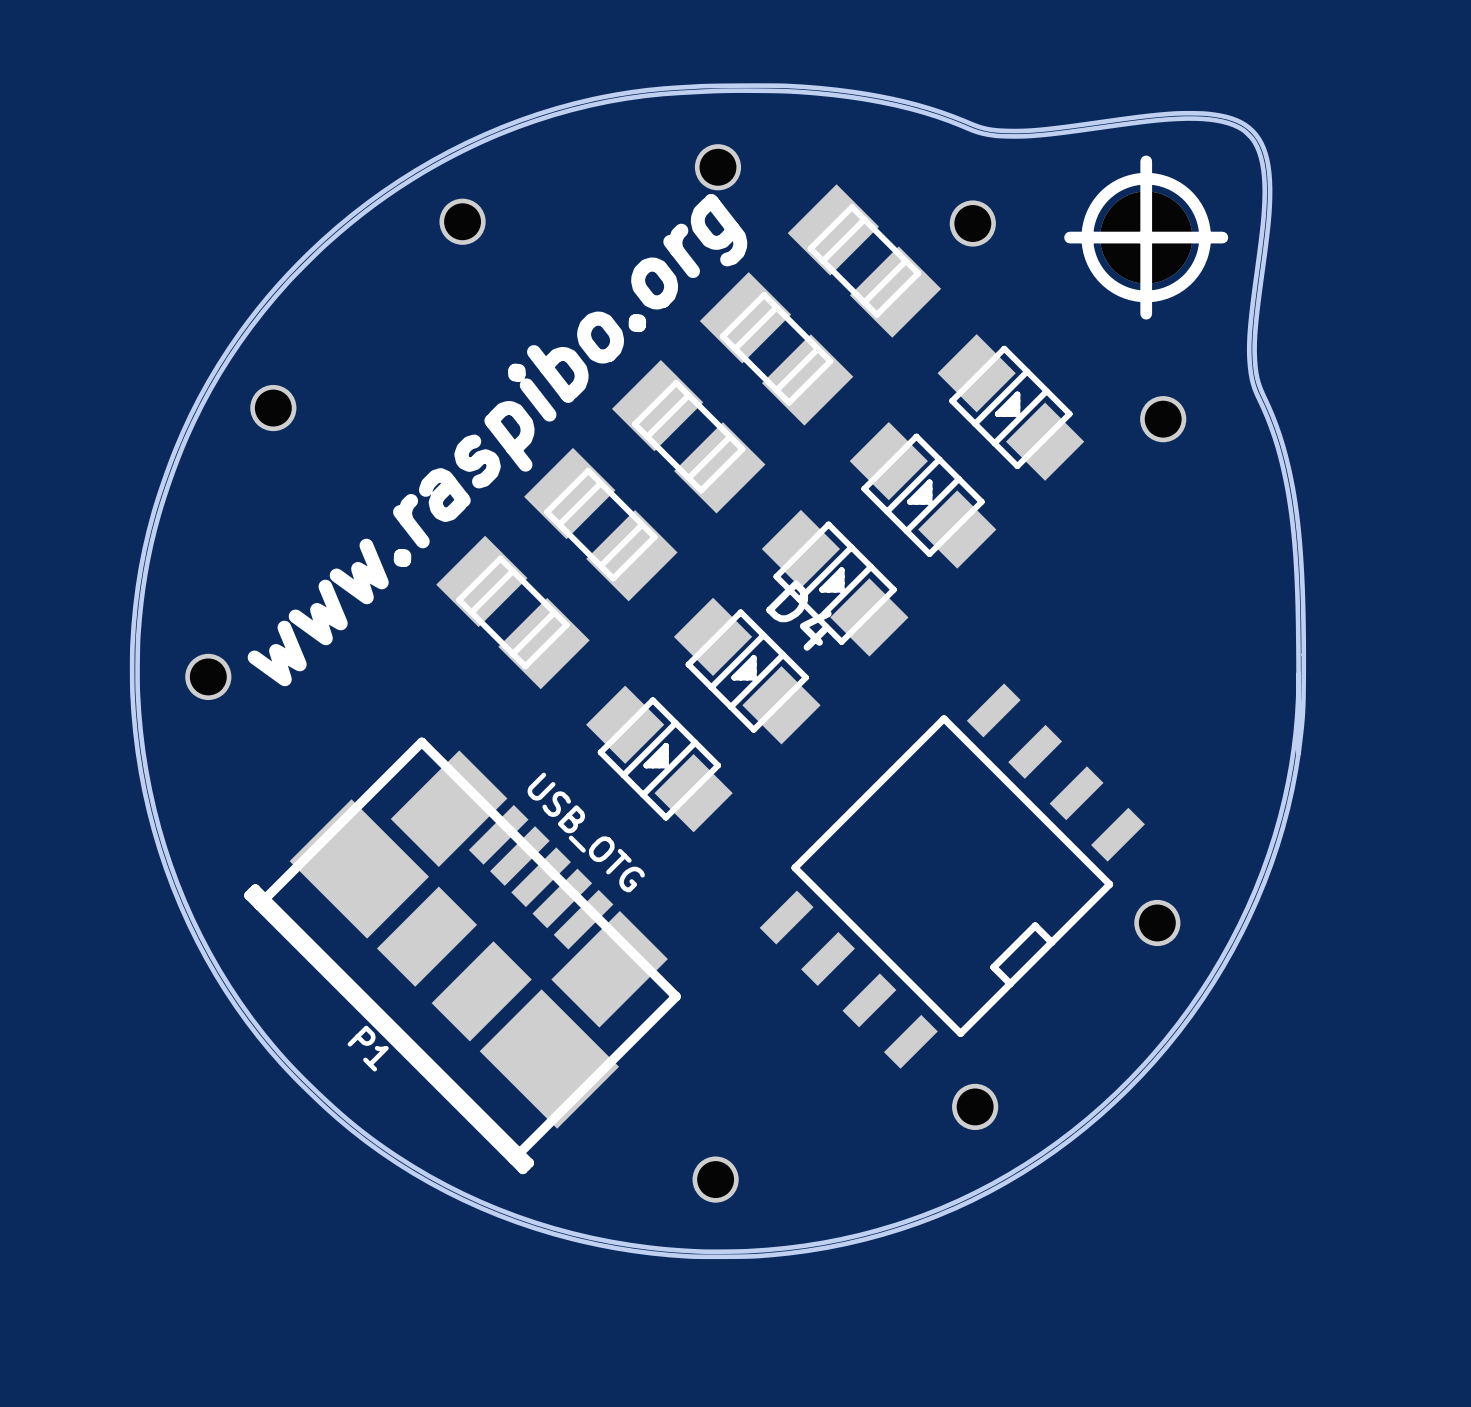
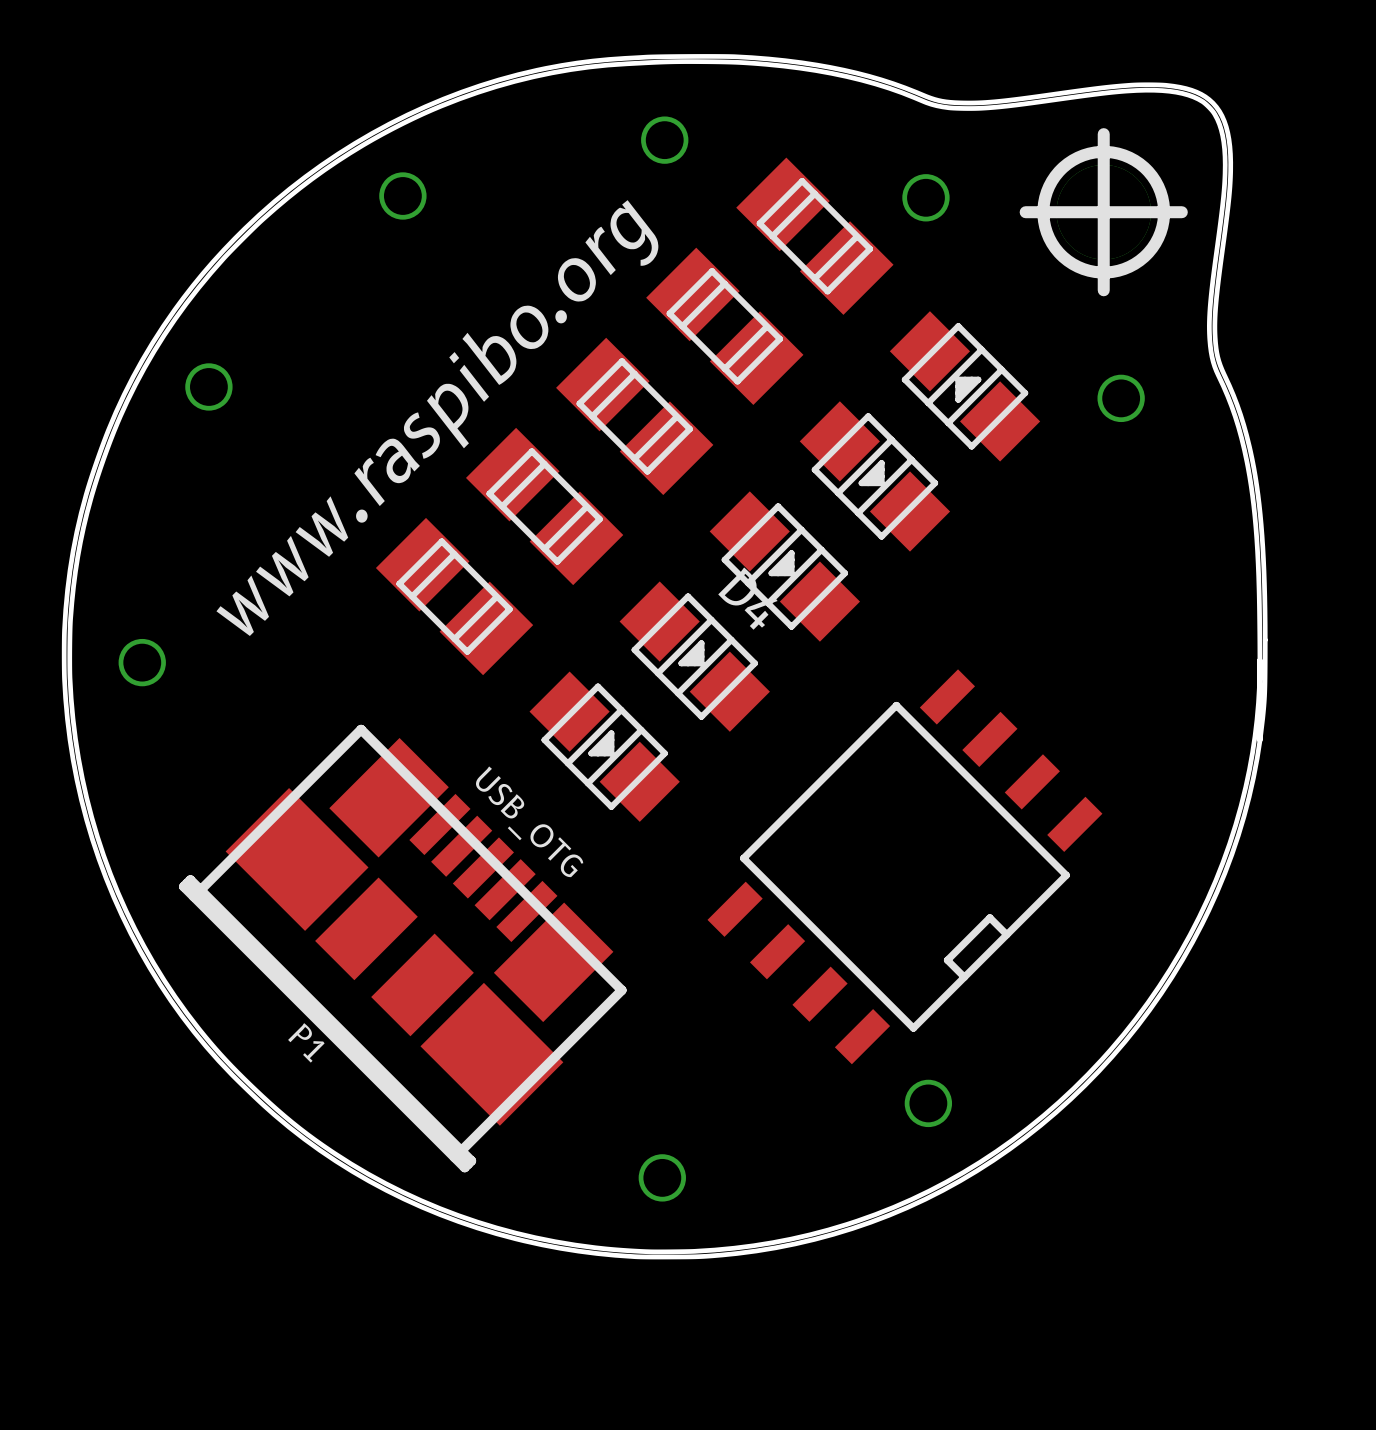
part rotation: 0° (1010, 407) -> 180° (965, 386)
part: (1157, 922) -> none

